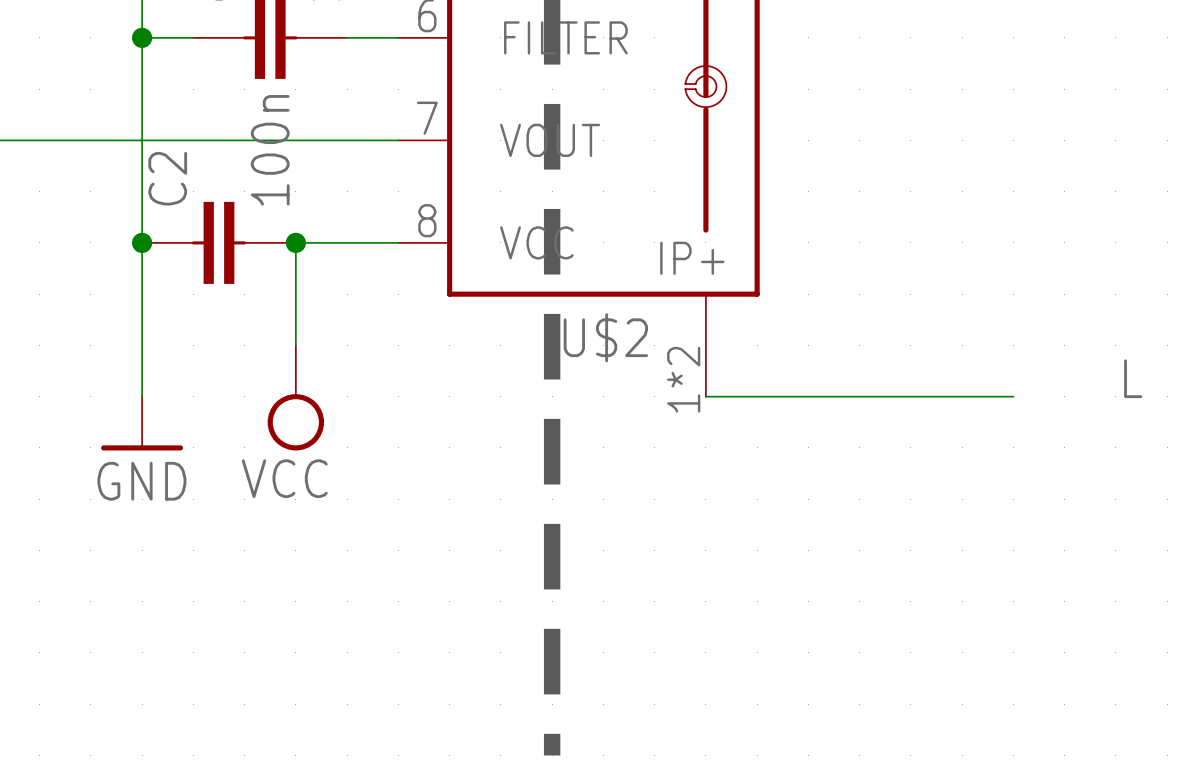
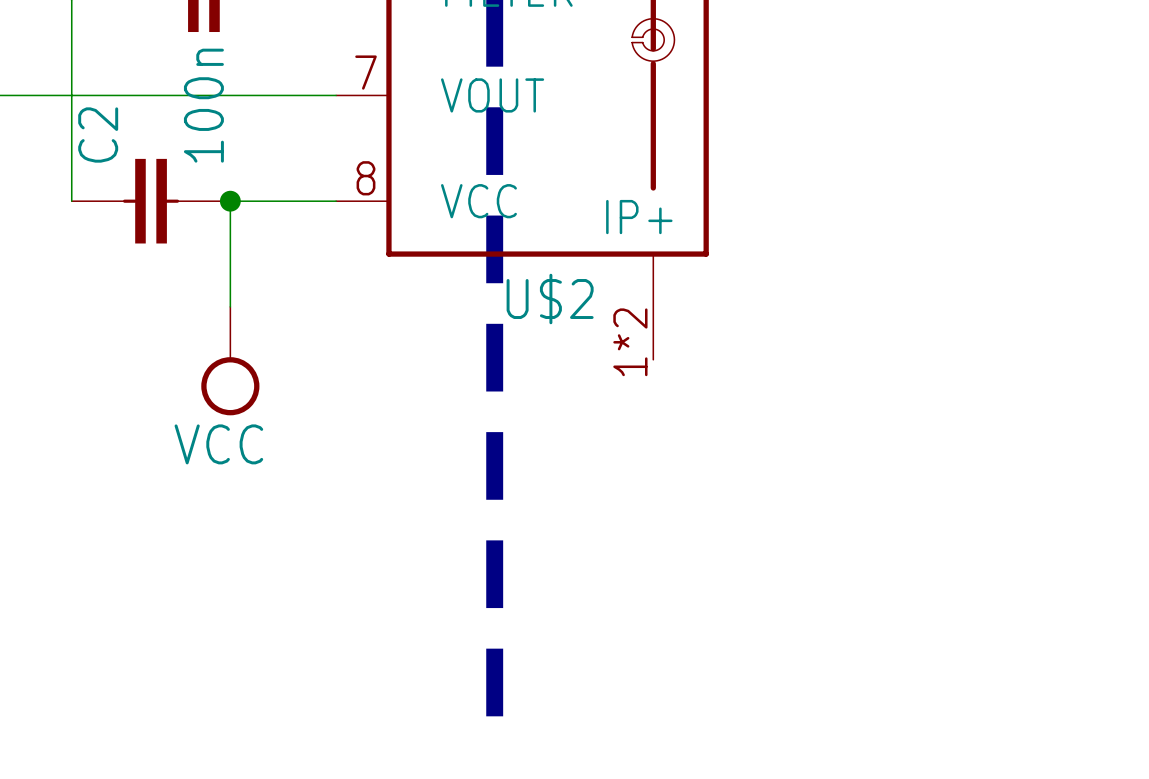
wire: (142, 242) (142, 396) -> none
junction: (142, 242) -> none
label: L (1133, 378) -> none
wire: (705, 396) (1013, 396) -> none
power symbol: GND (142, 423) -> none

